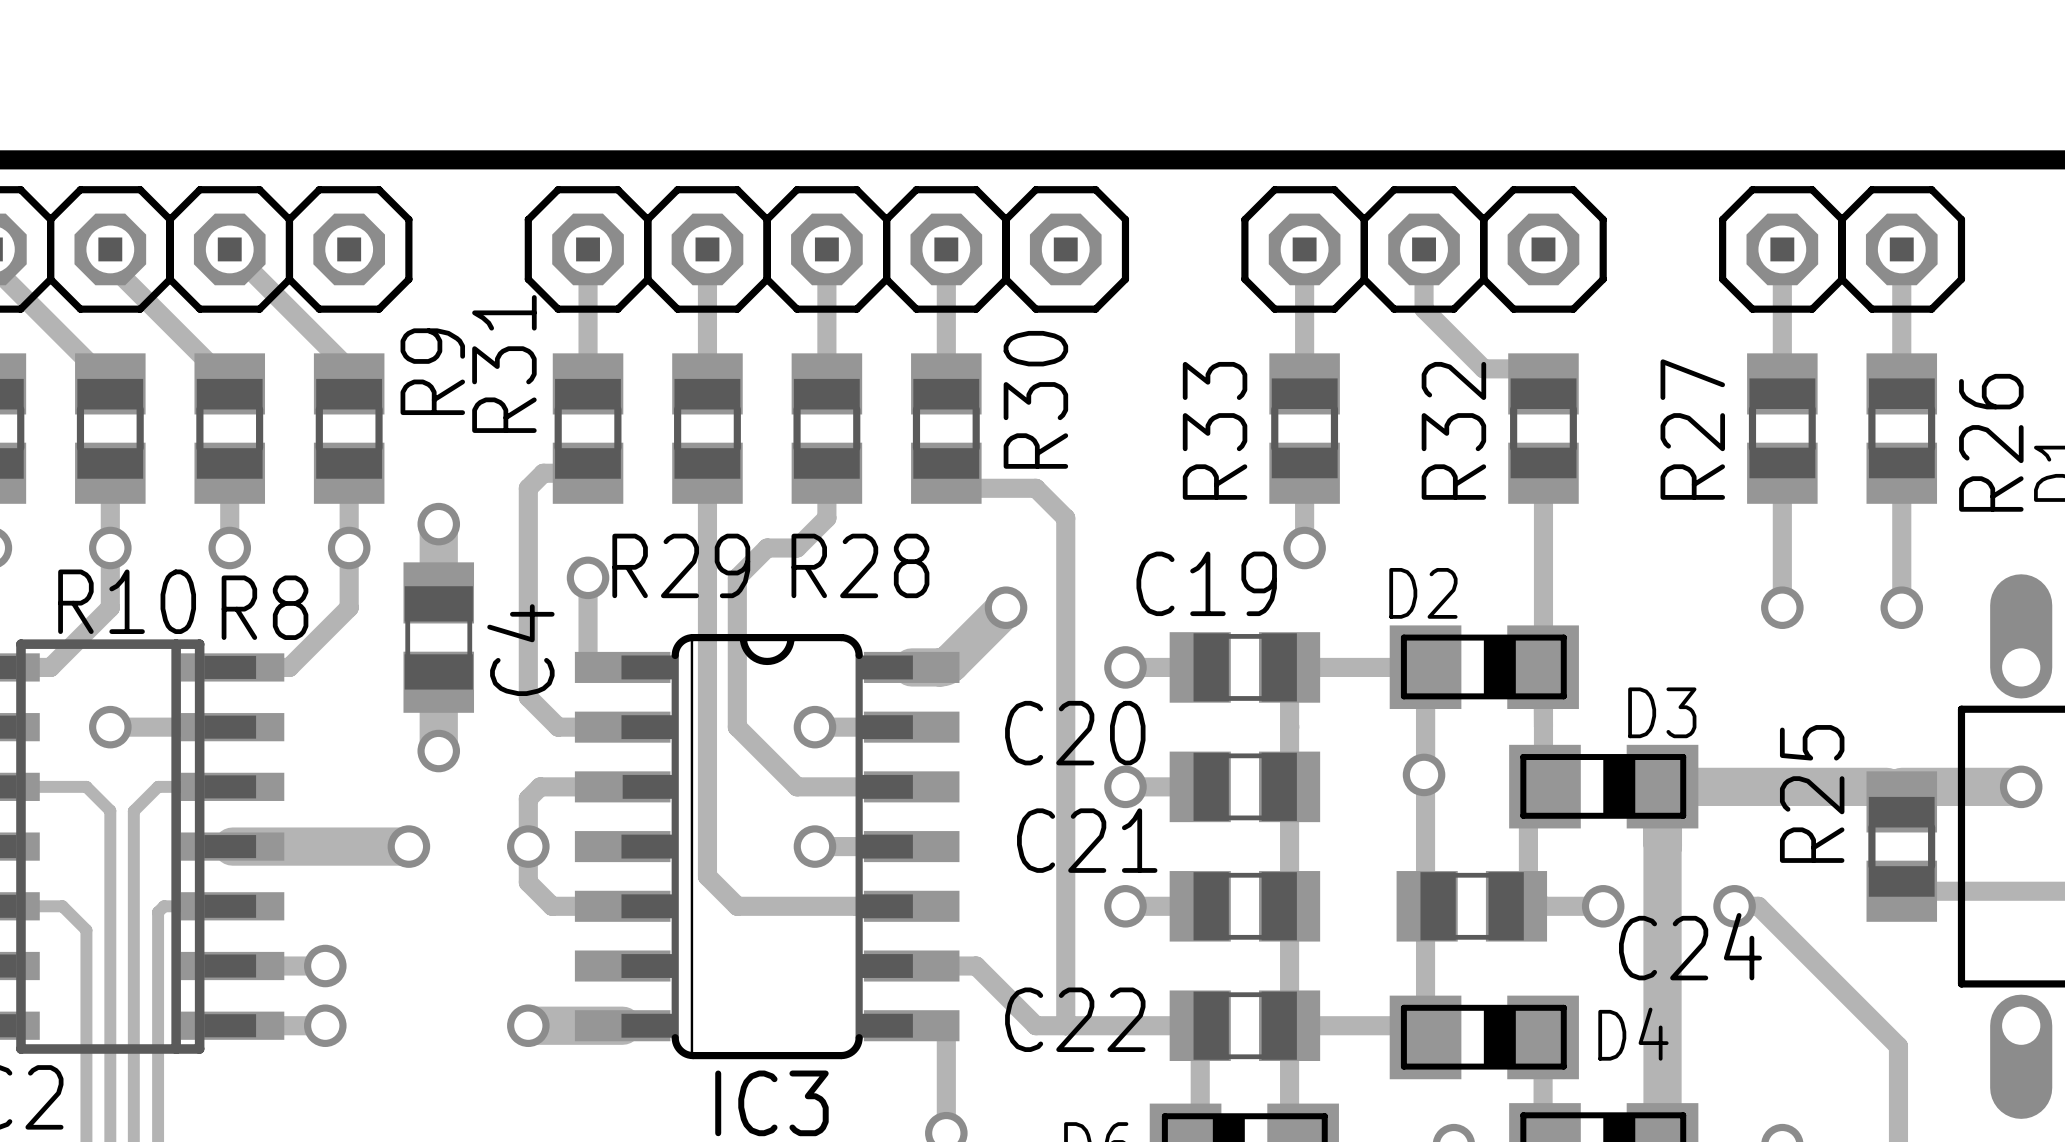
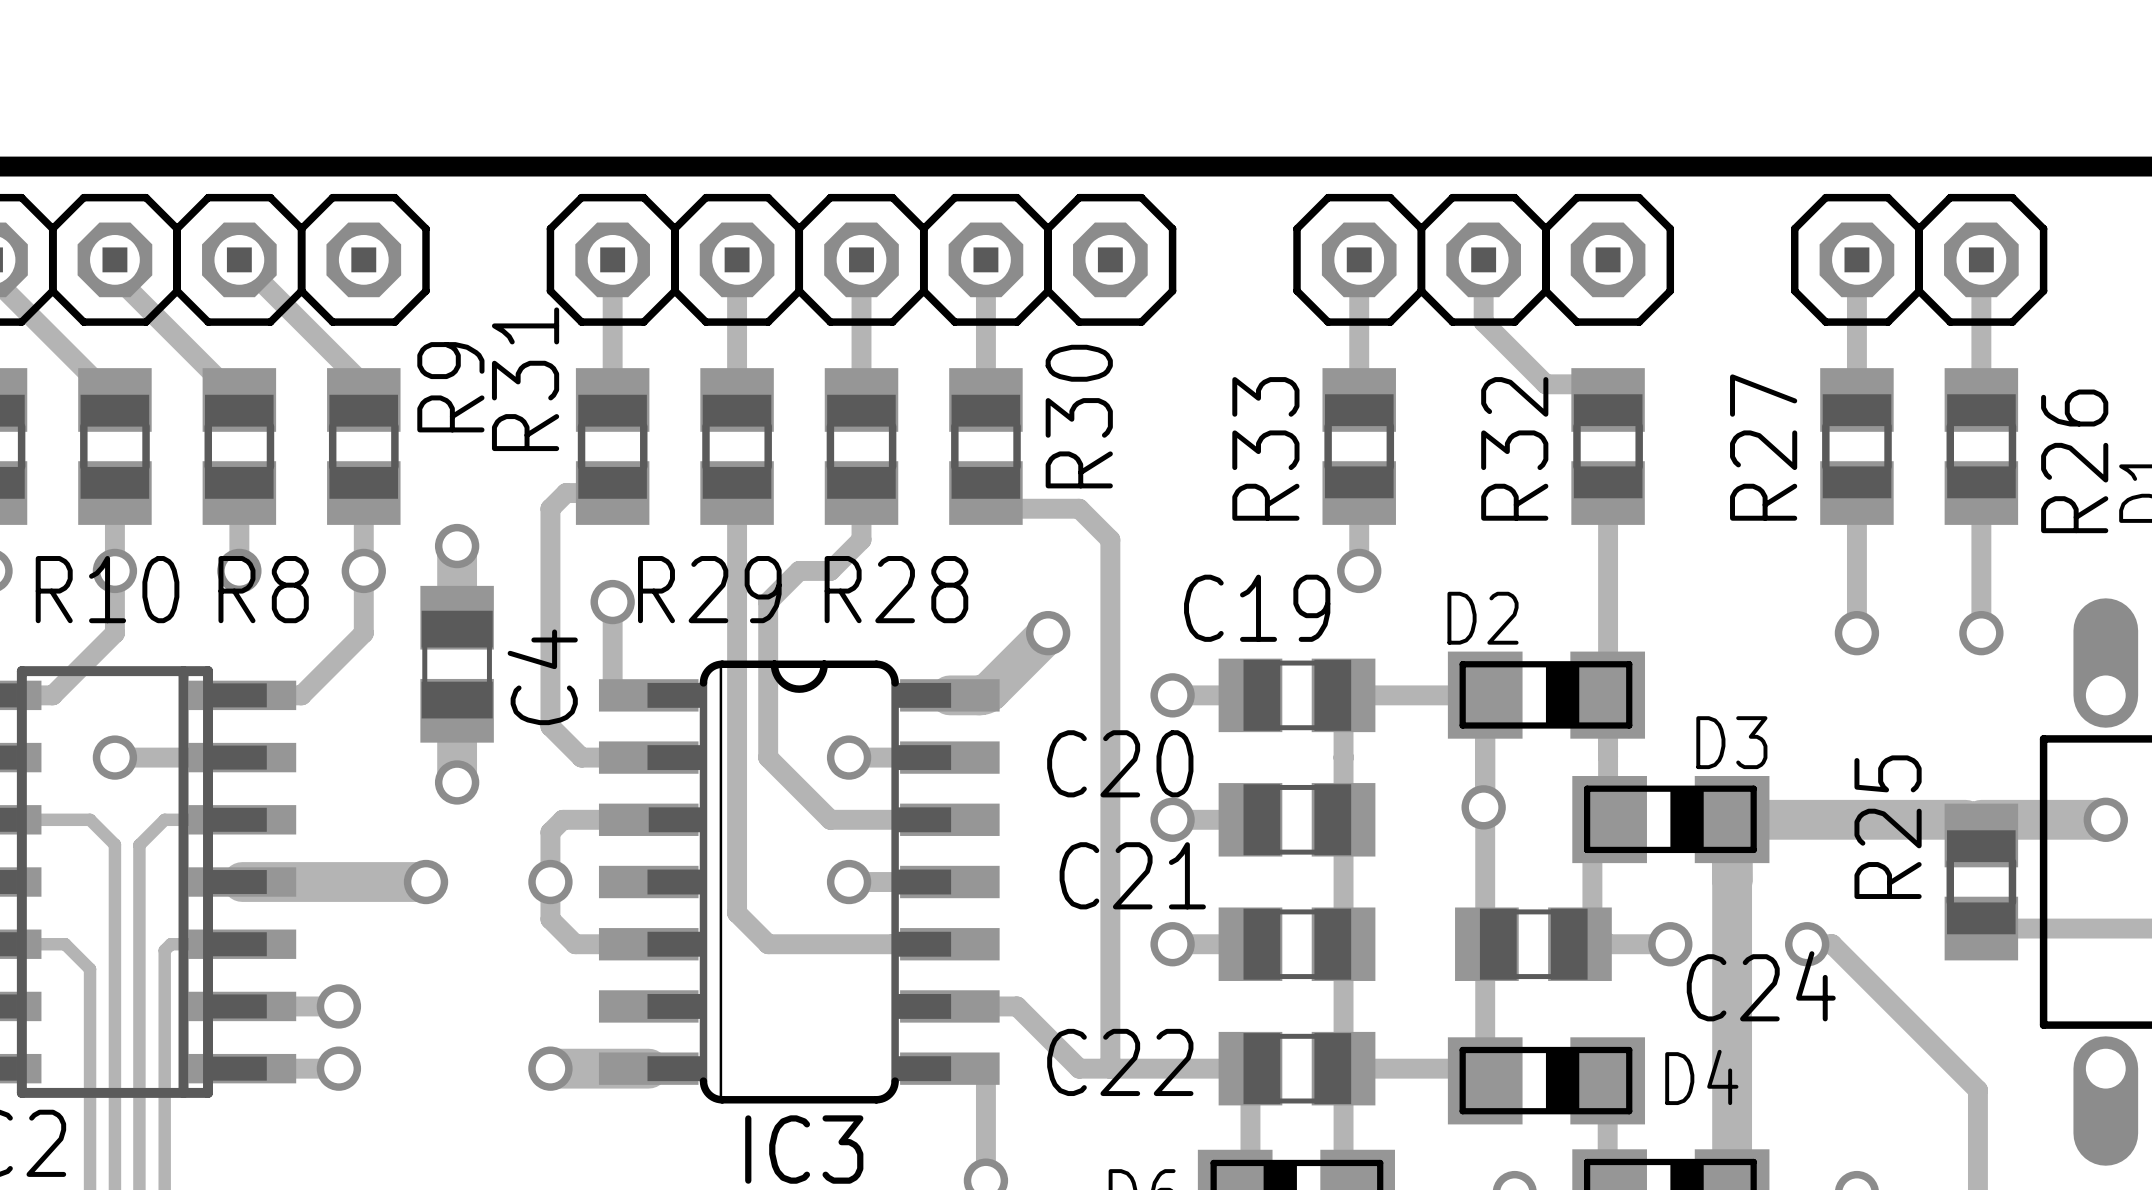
R10 name position: R10 (127, 601) -> R10 (107, 589)
R8 name position: R8 (264, 607) -> R8 (263, 589)

